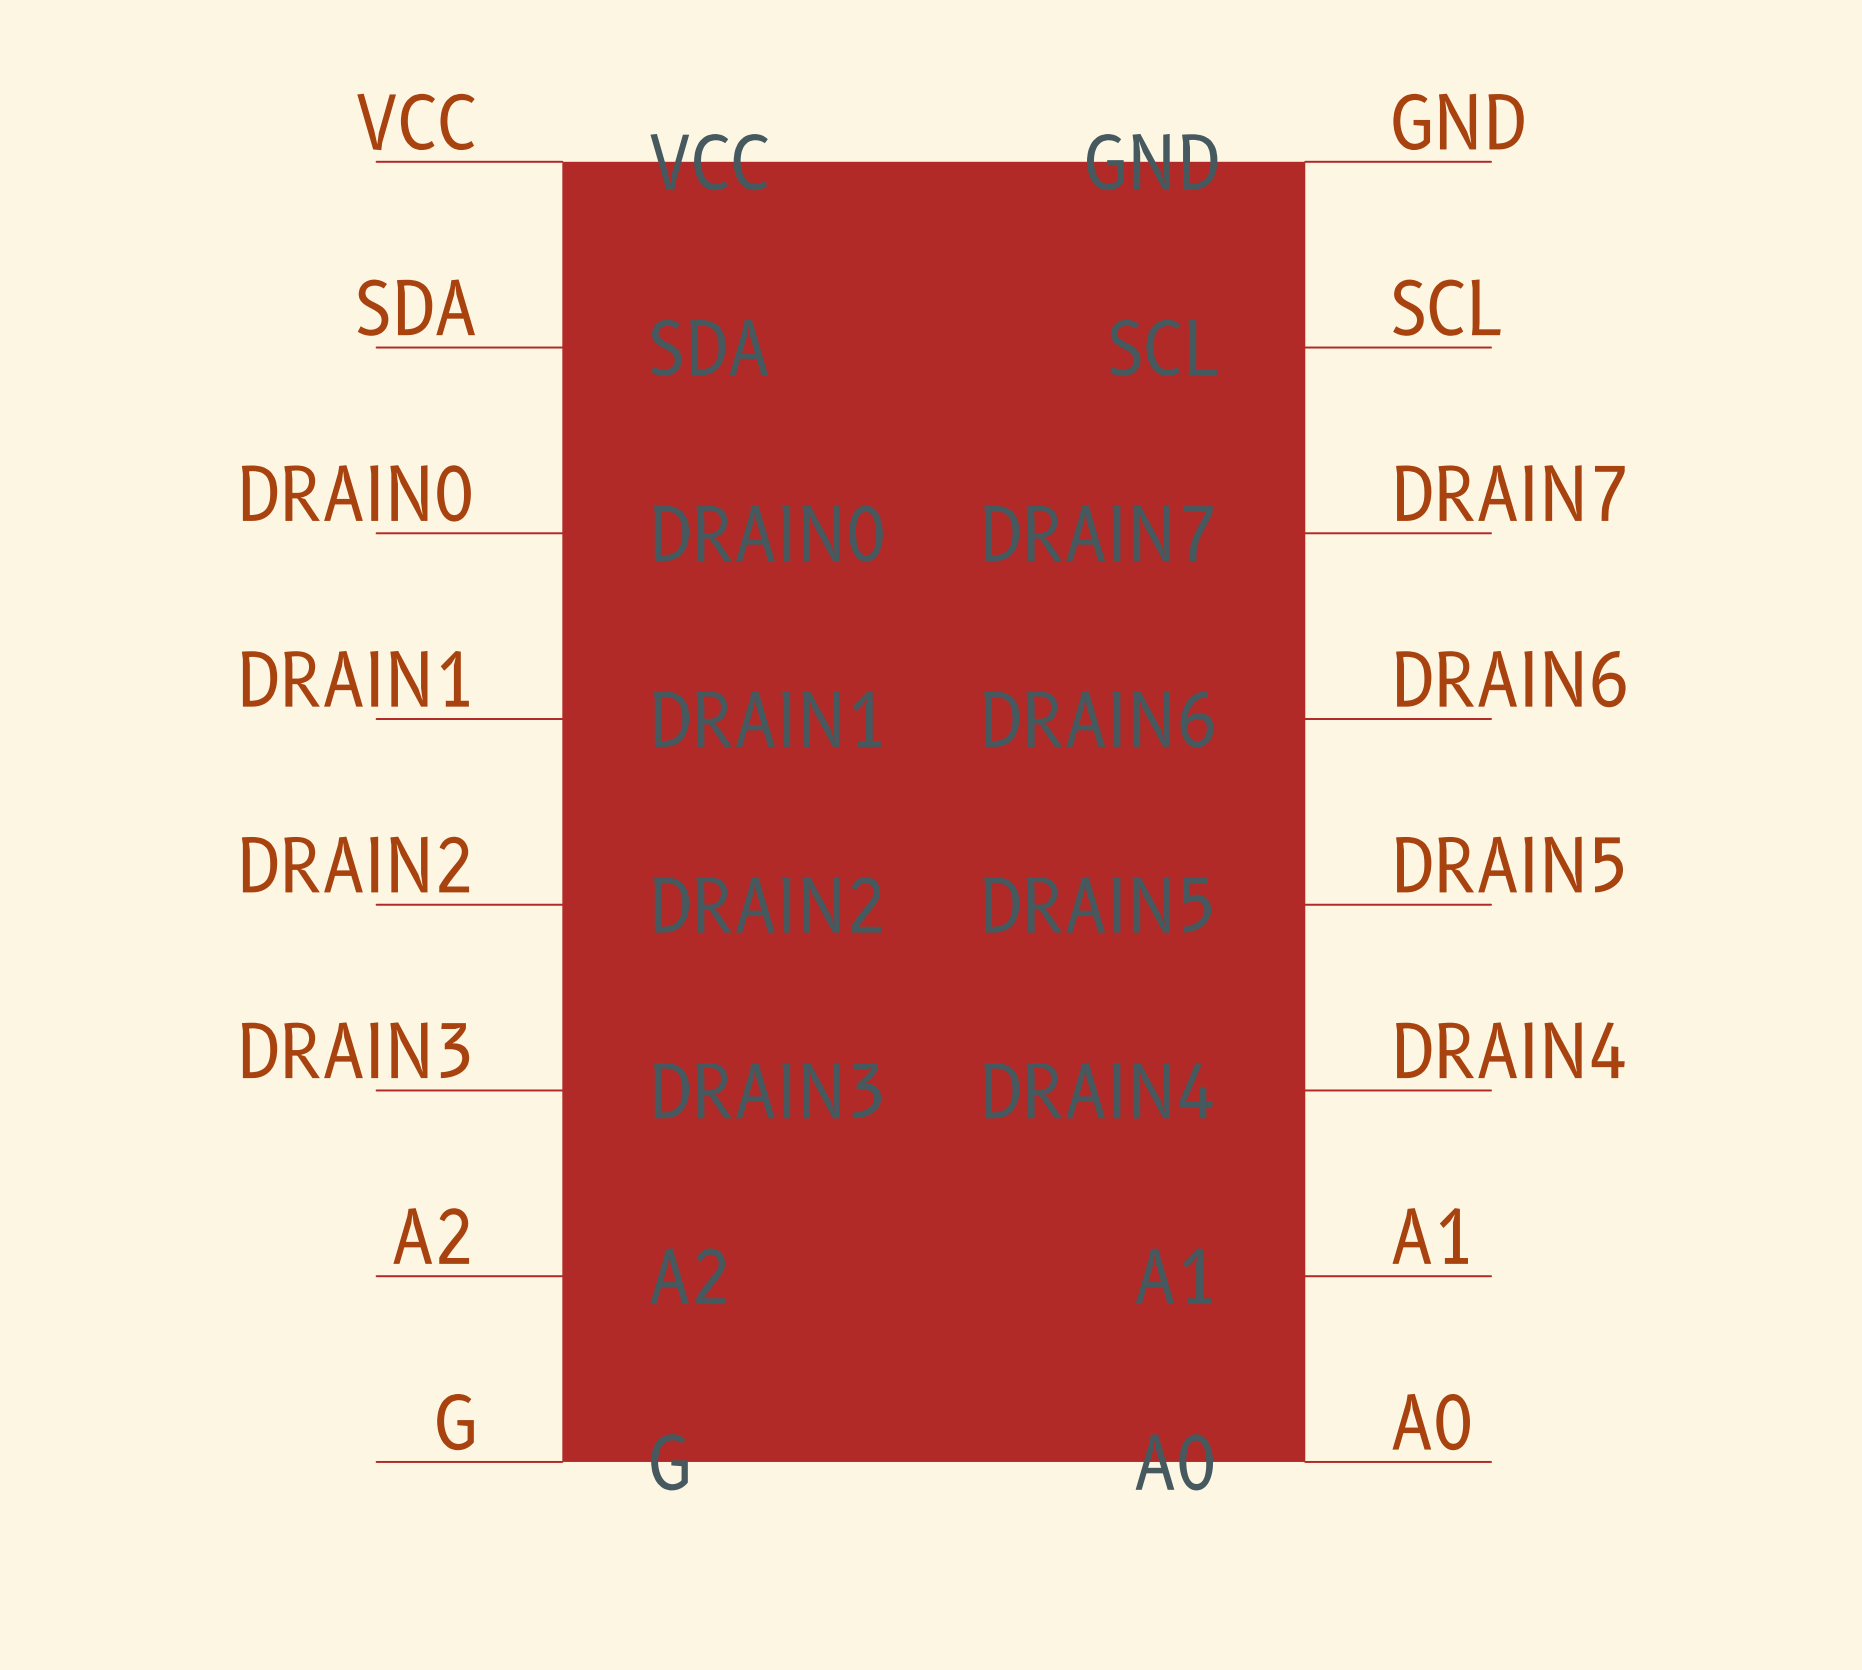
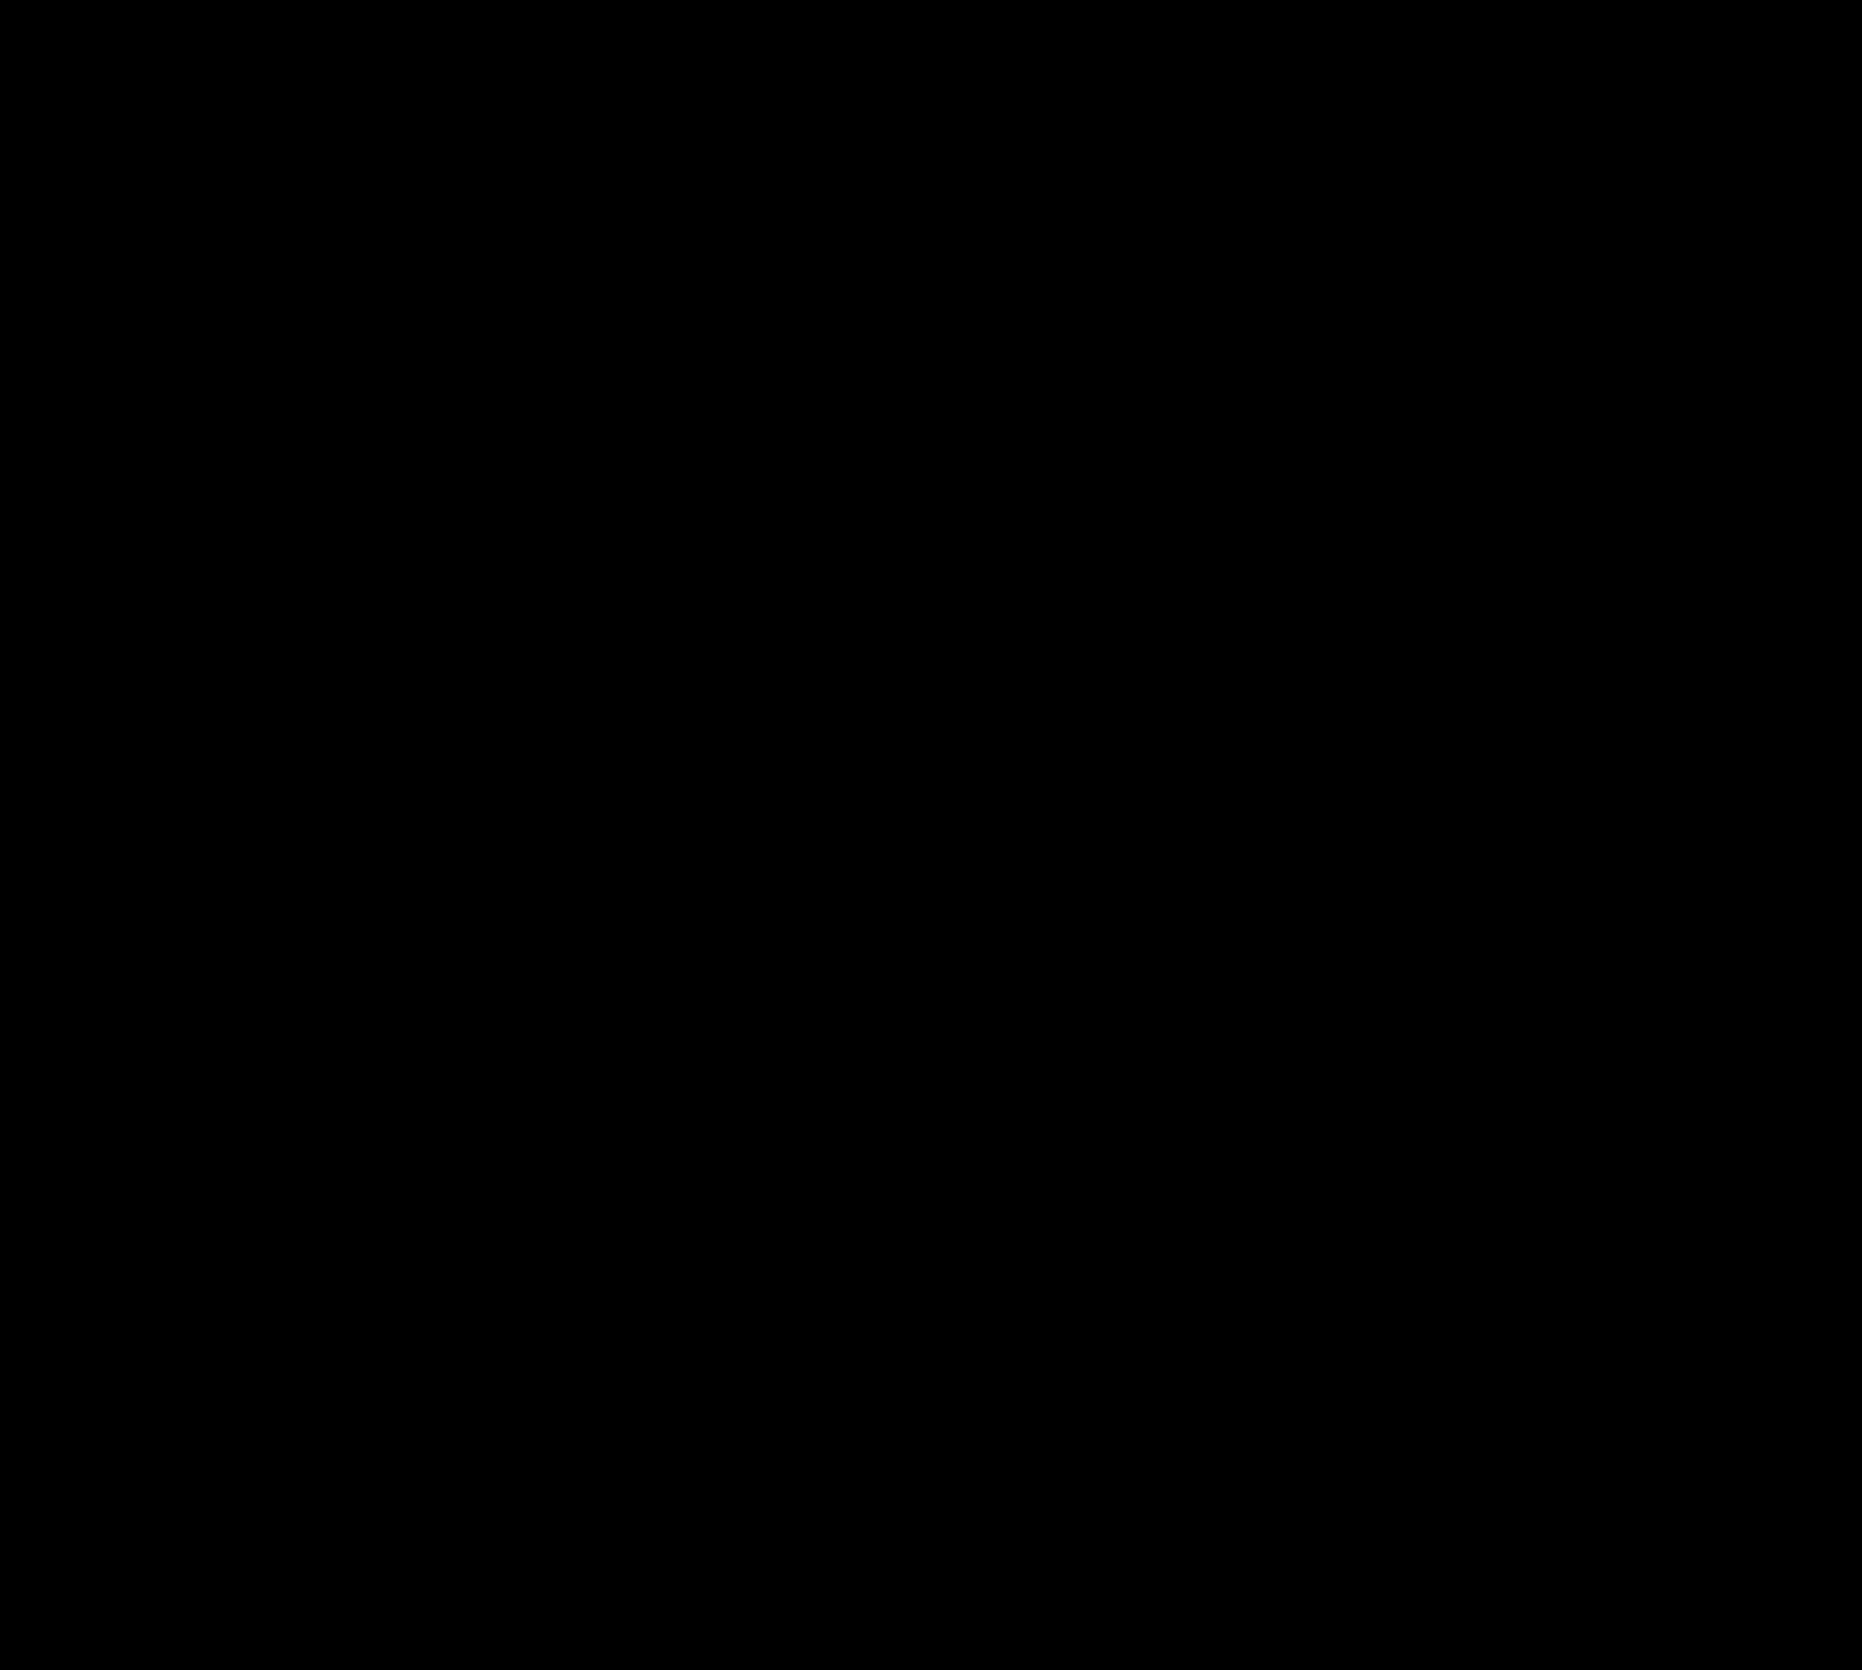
part: (933, 811) -> none

